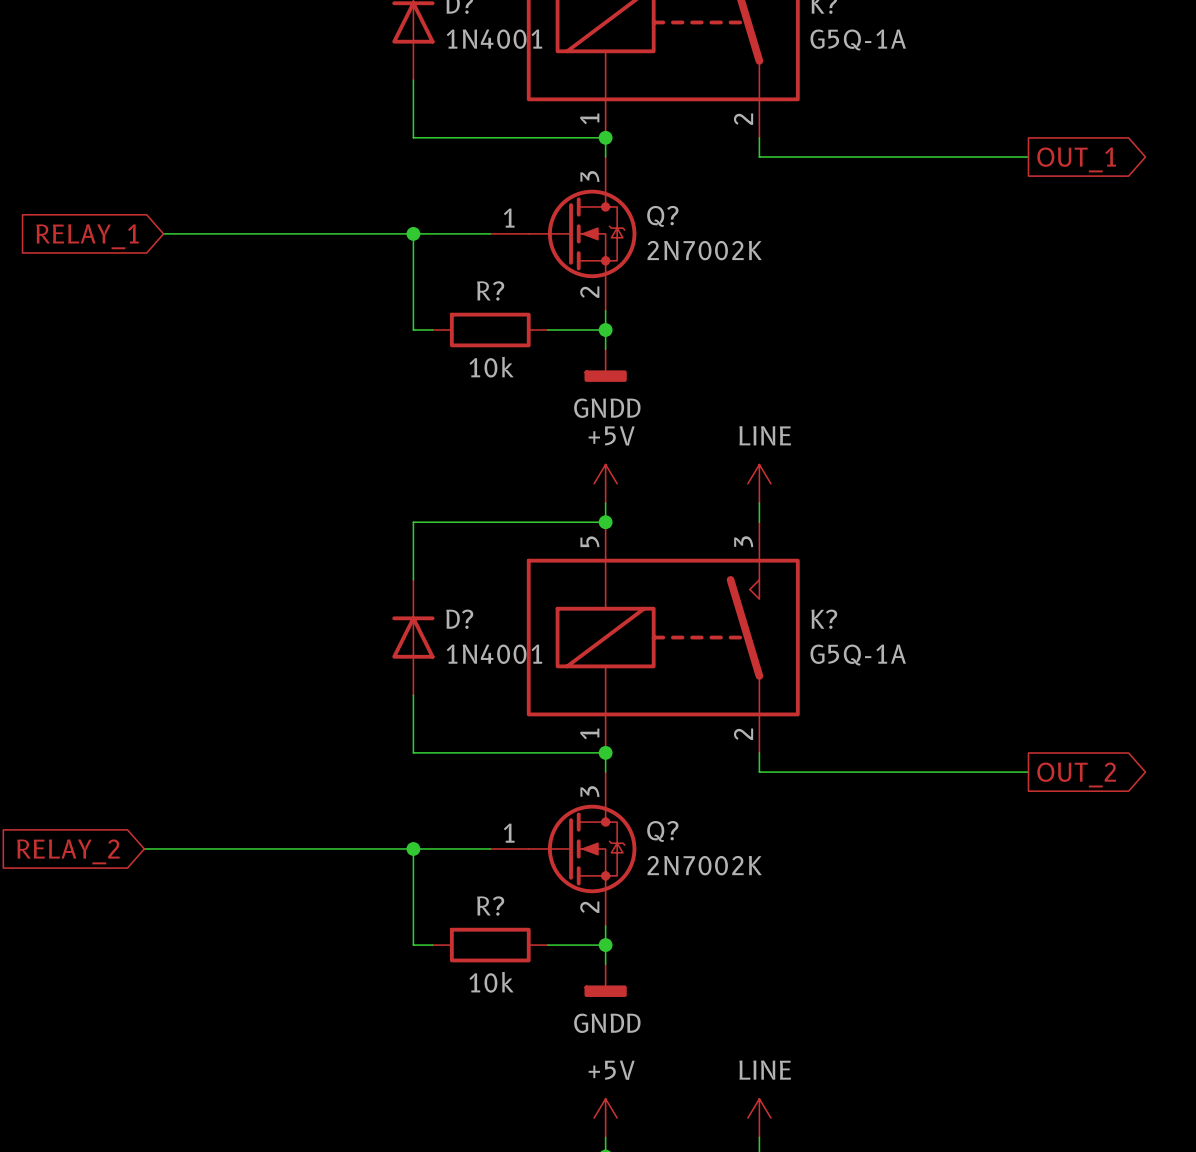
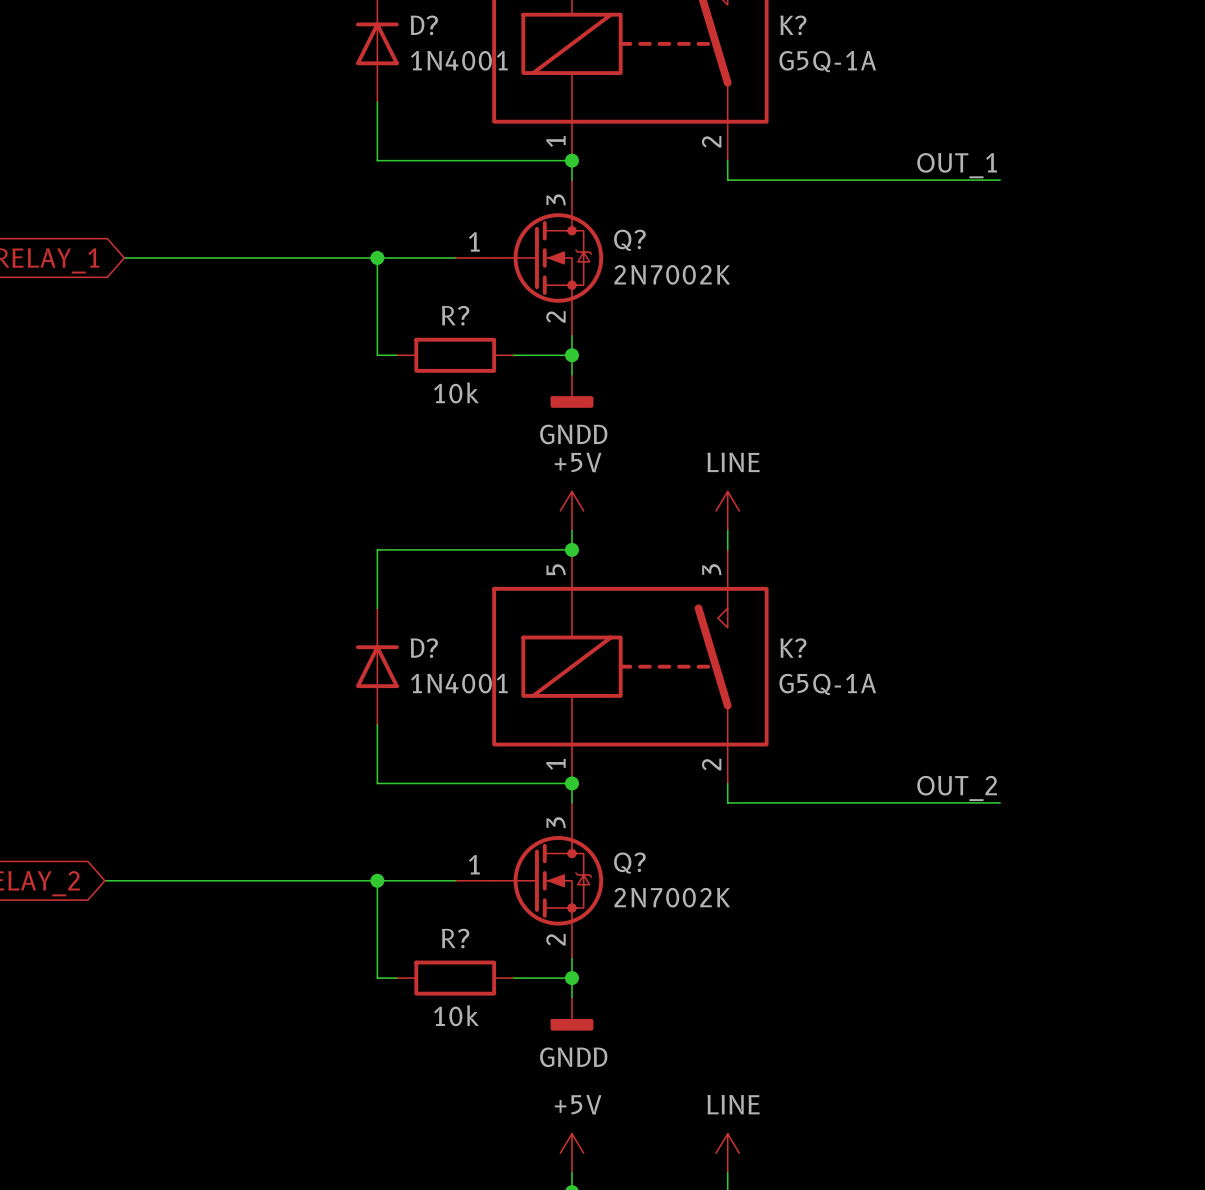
label: none -> OUT_1 (957, 165)
global label: OUT_1 (1076, 159) -> none
label: none -> OUT_2 (957, 788)
global label: OUT_2 (1076, 774) -> none

